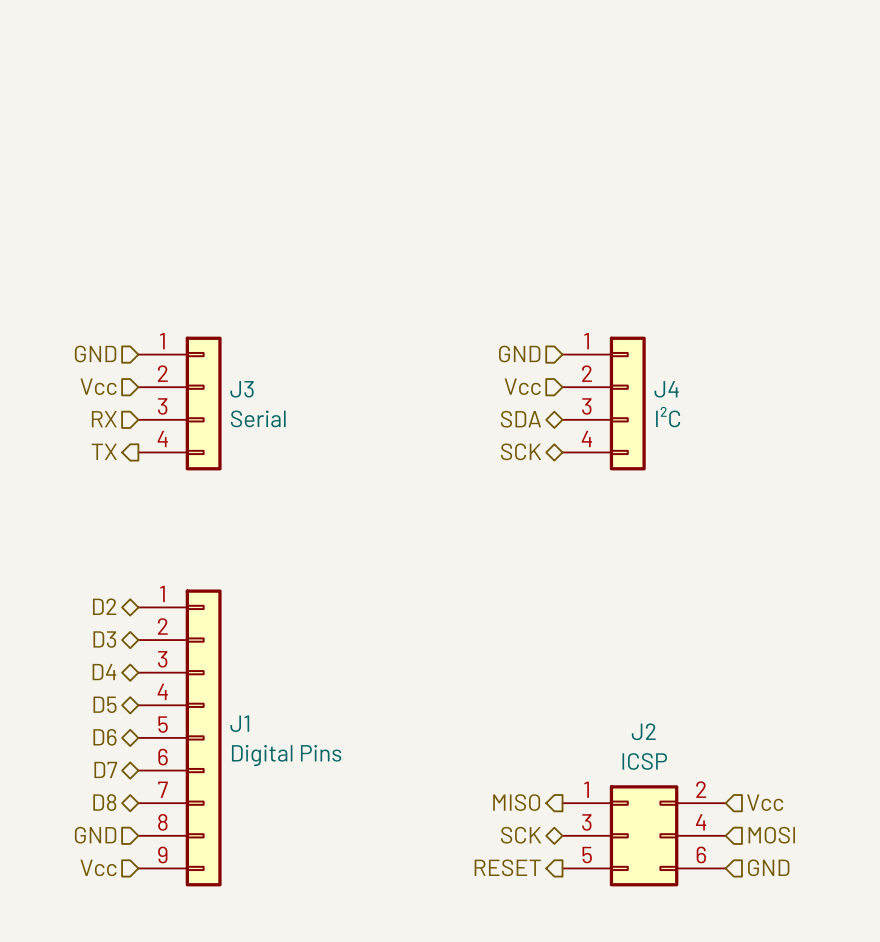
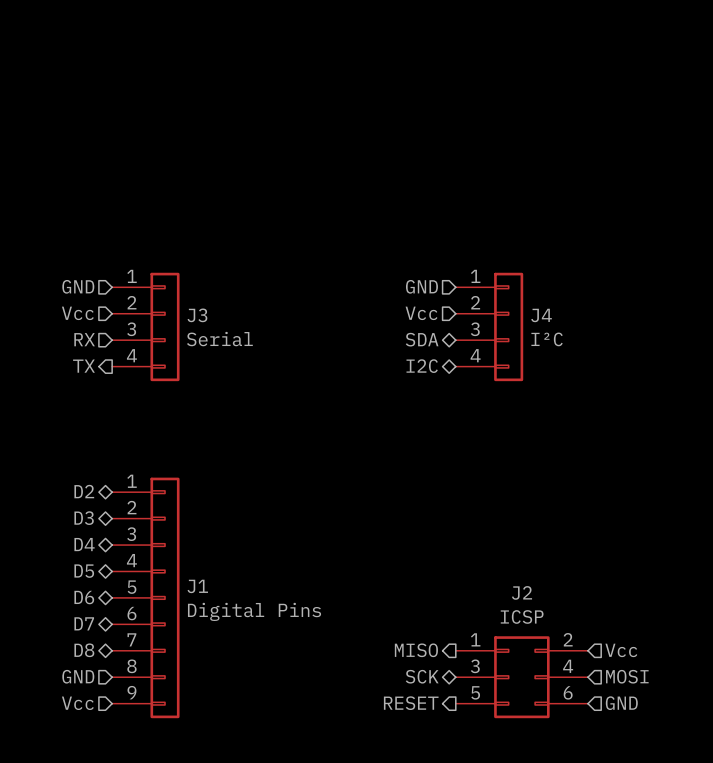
hierarchical label: SCK (521, 451) -> I2C (422, 366)

